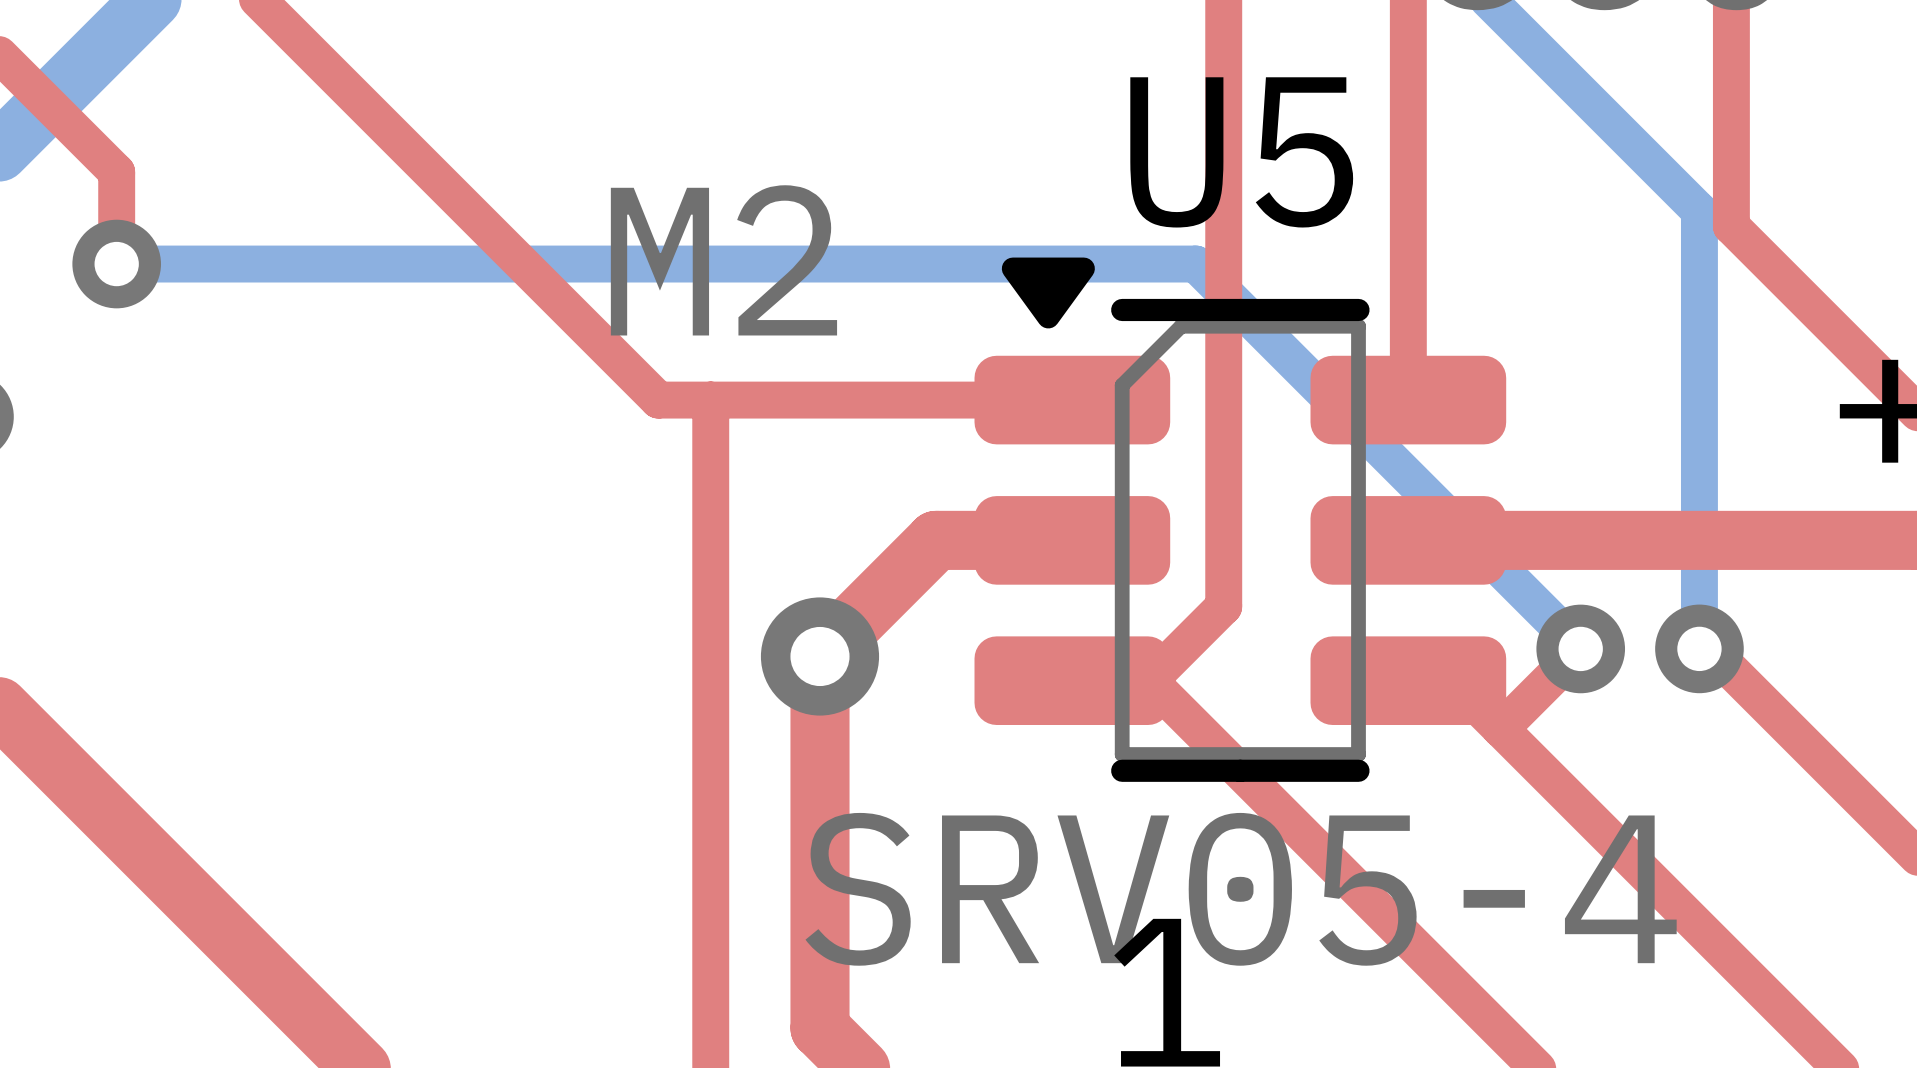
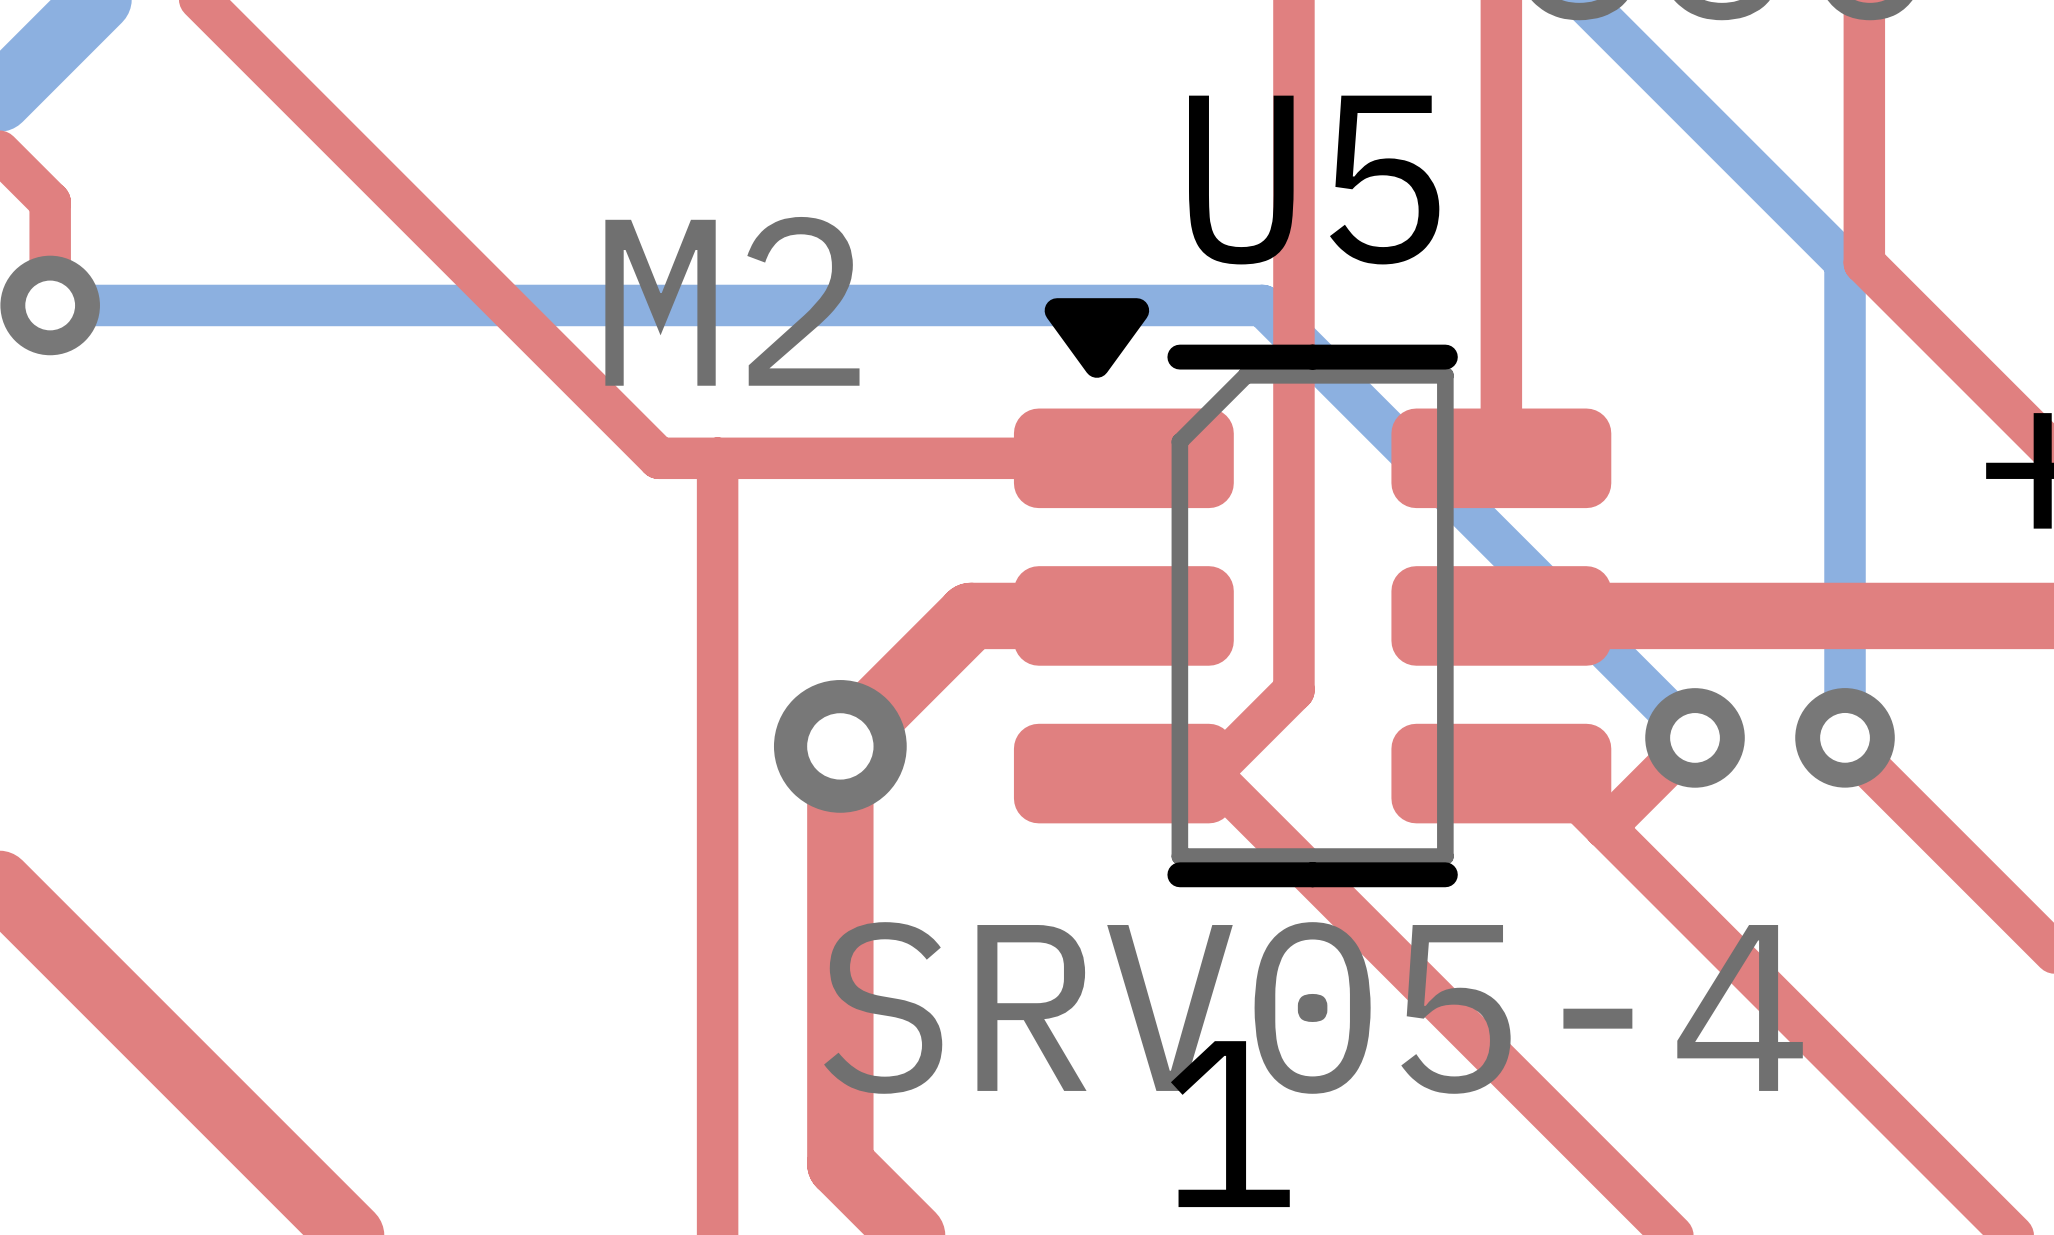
bottom track: (1699, 210) (1699, 648) -> (1828, 245) (1845, 262) (1845, 737)
via position: (1699, 648) -> (1845, 737)

